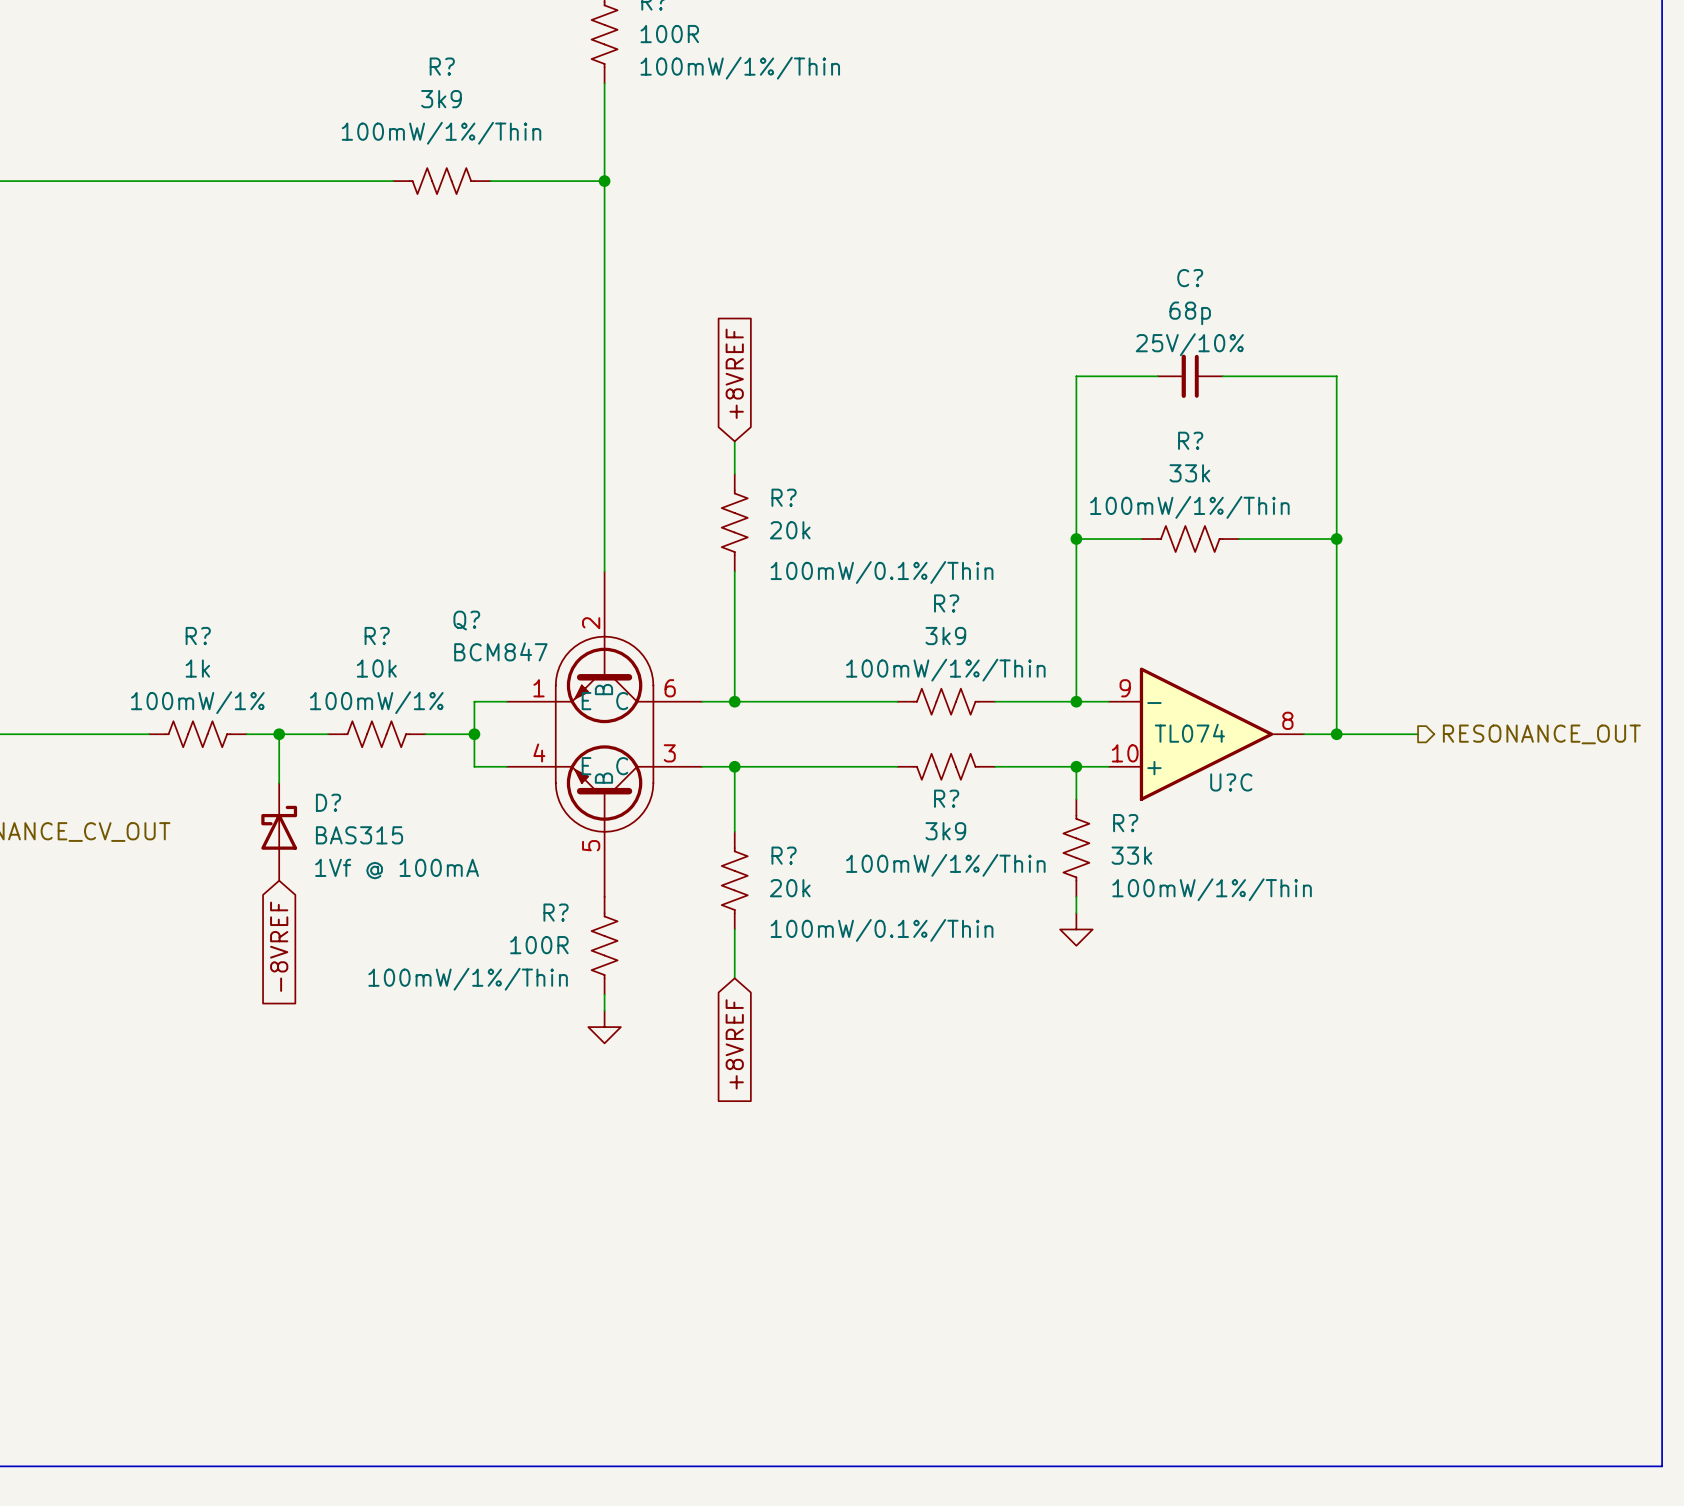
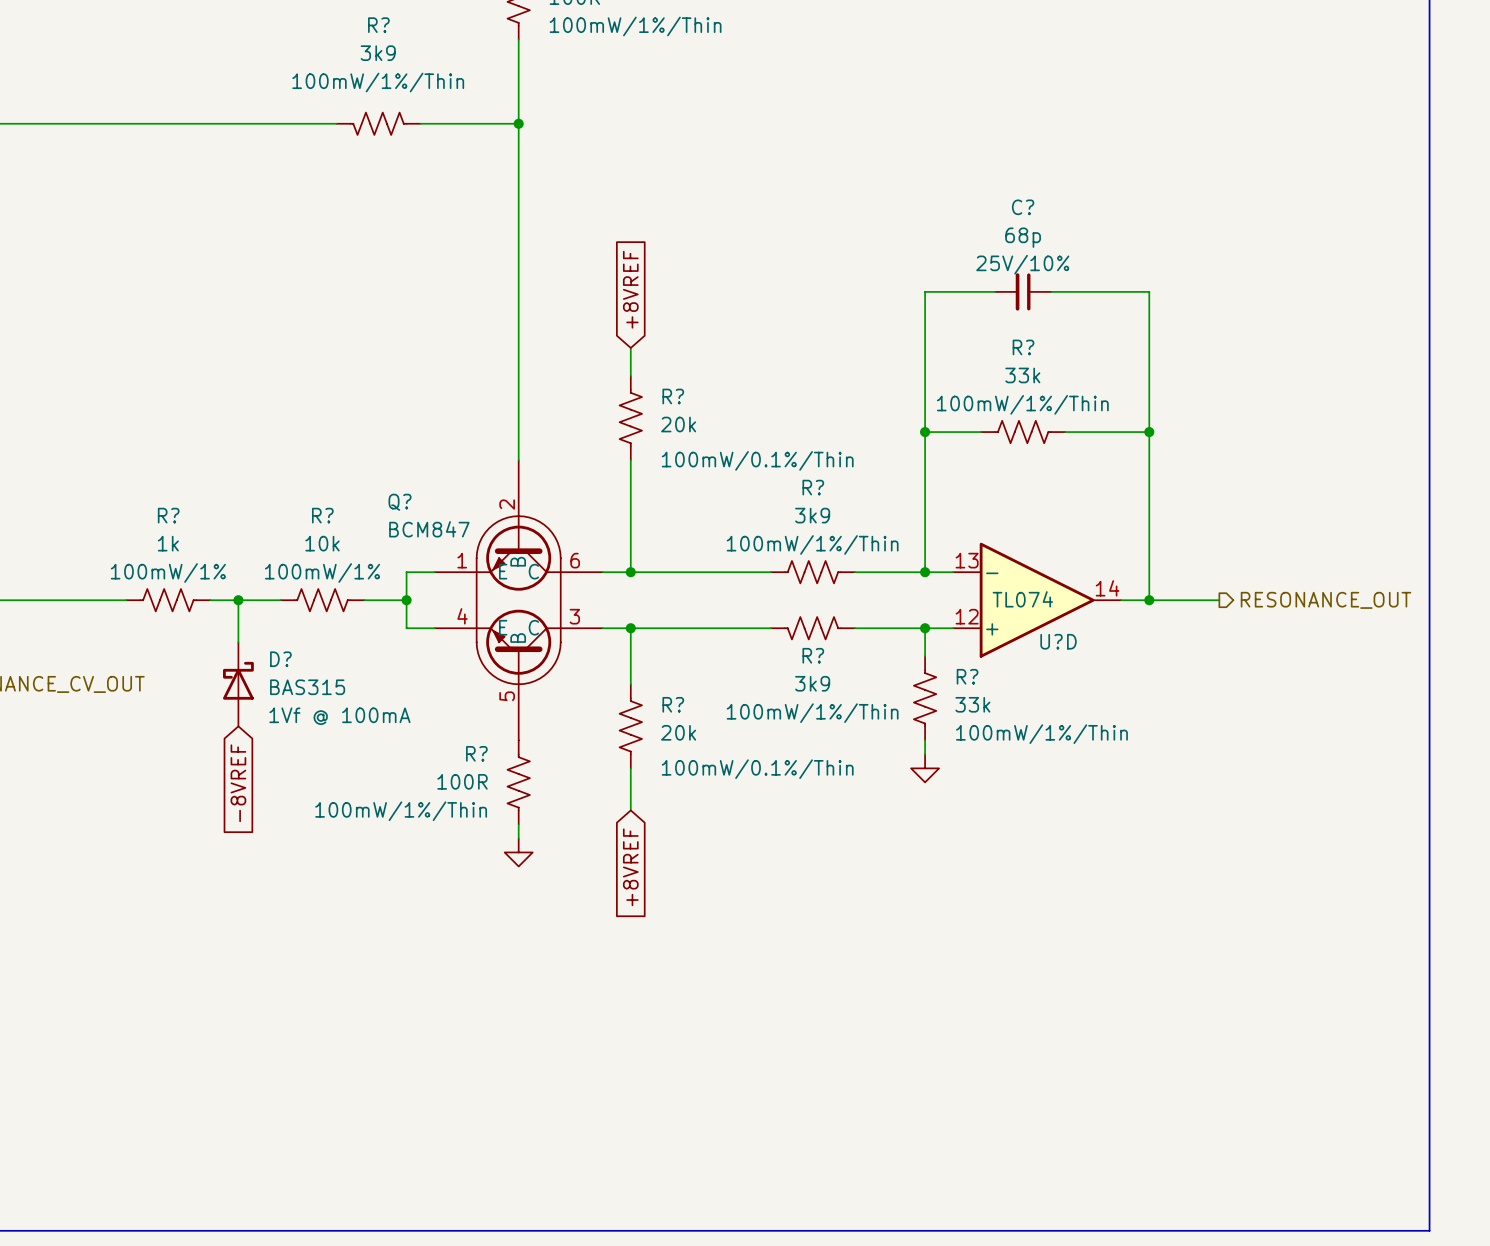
U?C pin number: 9 (1125, 688) -> 13 (967, 560)
U?C pin number: 8 (1287, 720) -> 14 (1107, 588)
U?C pin number: 10 (1125, 753) -> 12 (967, 616)
U?C name: U?C (1231, 782) -> U?D (1058, 641)

